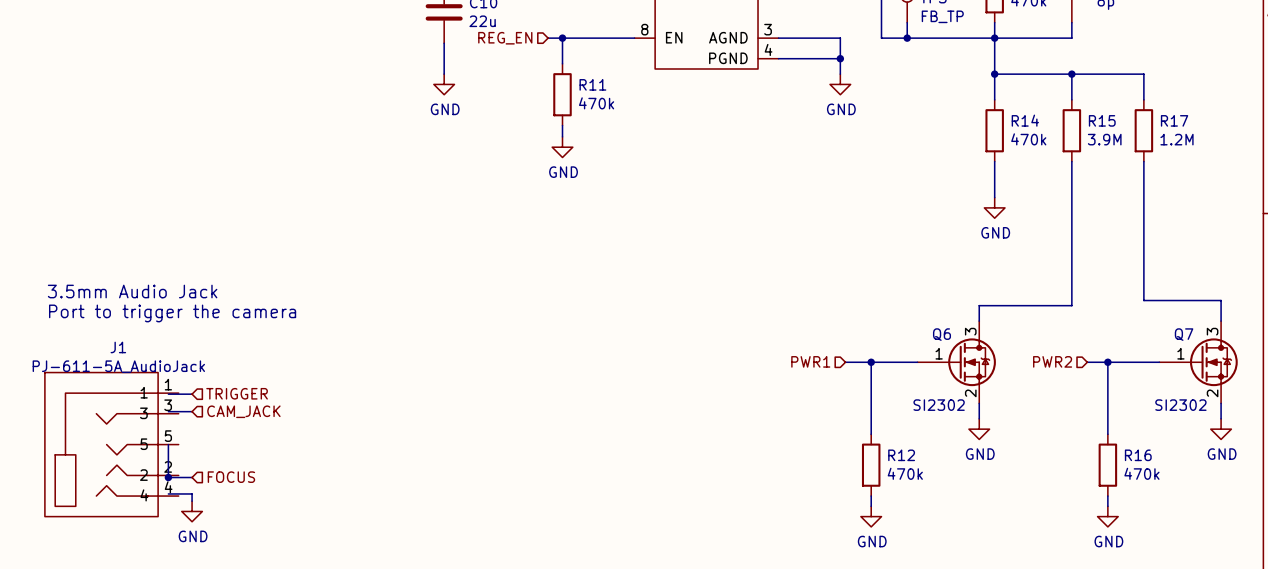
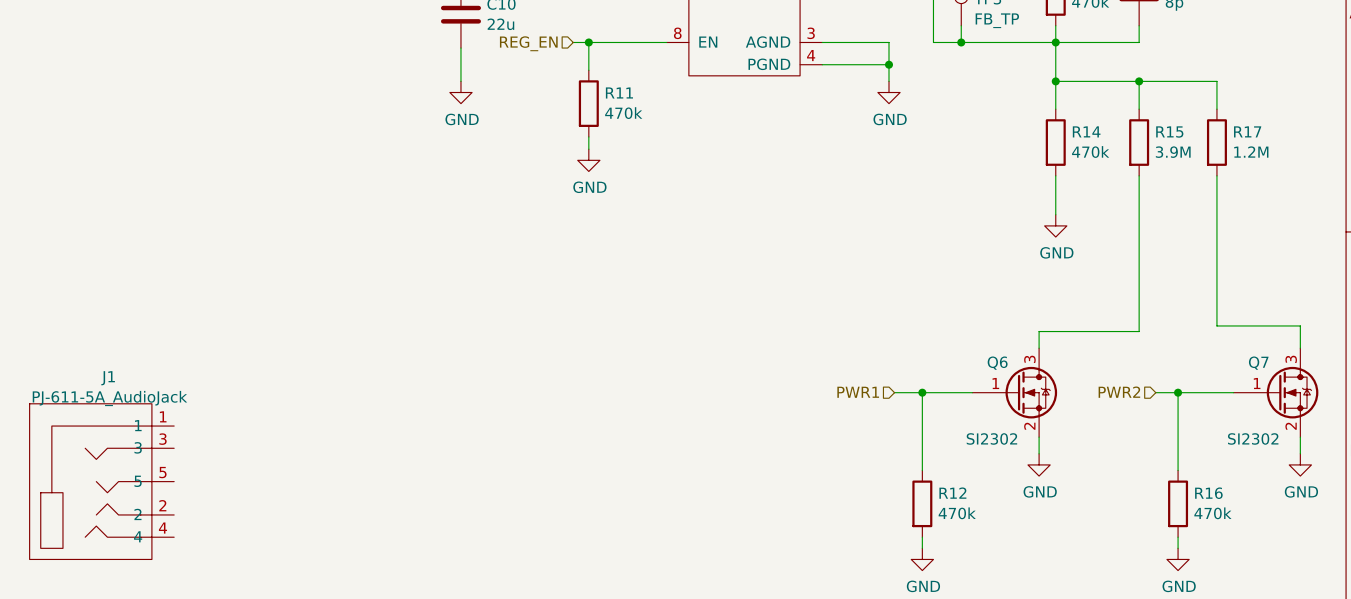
text: 3.5mm Audio Jack (132, 291) -> none
text: Port to trigger the camera (172, 313) -> none
hierarchical label: TRIGGER (237, 393) -> none
wire: (168, 394) (192, 394) -> none
wire: (168, 411) (192, 411) -> none
hierarchical label: CAM_JACK (243, 411) -> none
wire: (168, 444) (168, 477) (192, 477) -> none
junction: (168, 477) -> none
hierarchical label: FOCUS (231, 477) -> none
wire: (168, 493) (192, 493) (192, 501) -> none
power symbol: GND (192, 511) -> none

